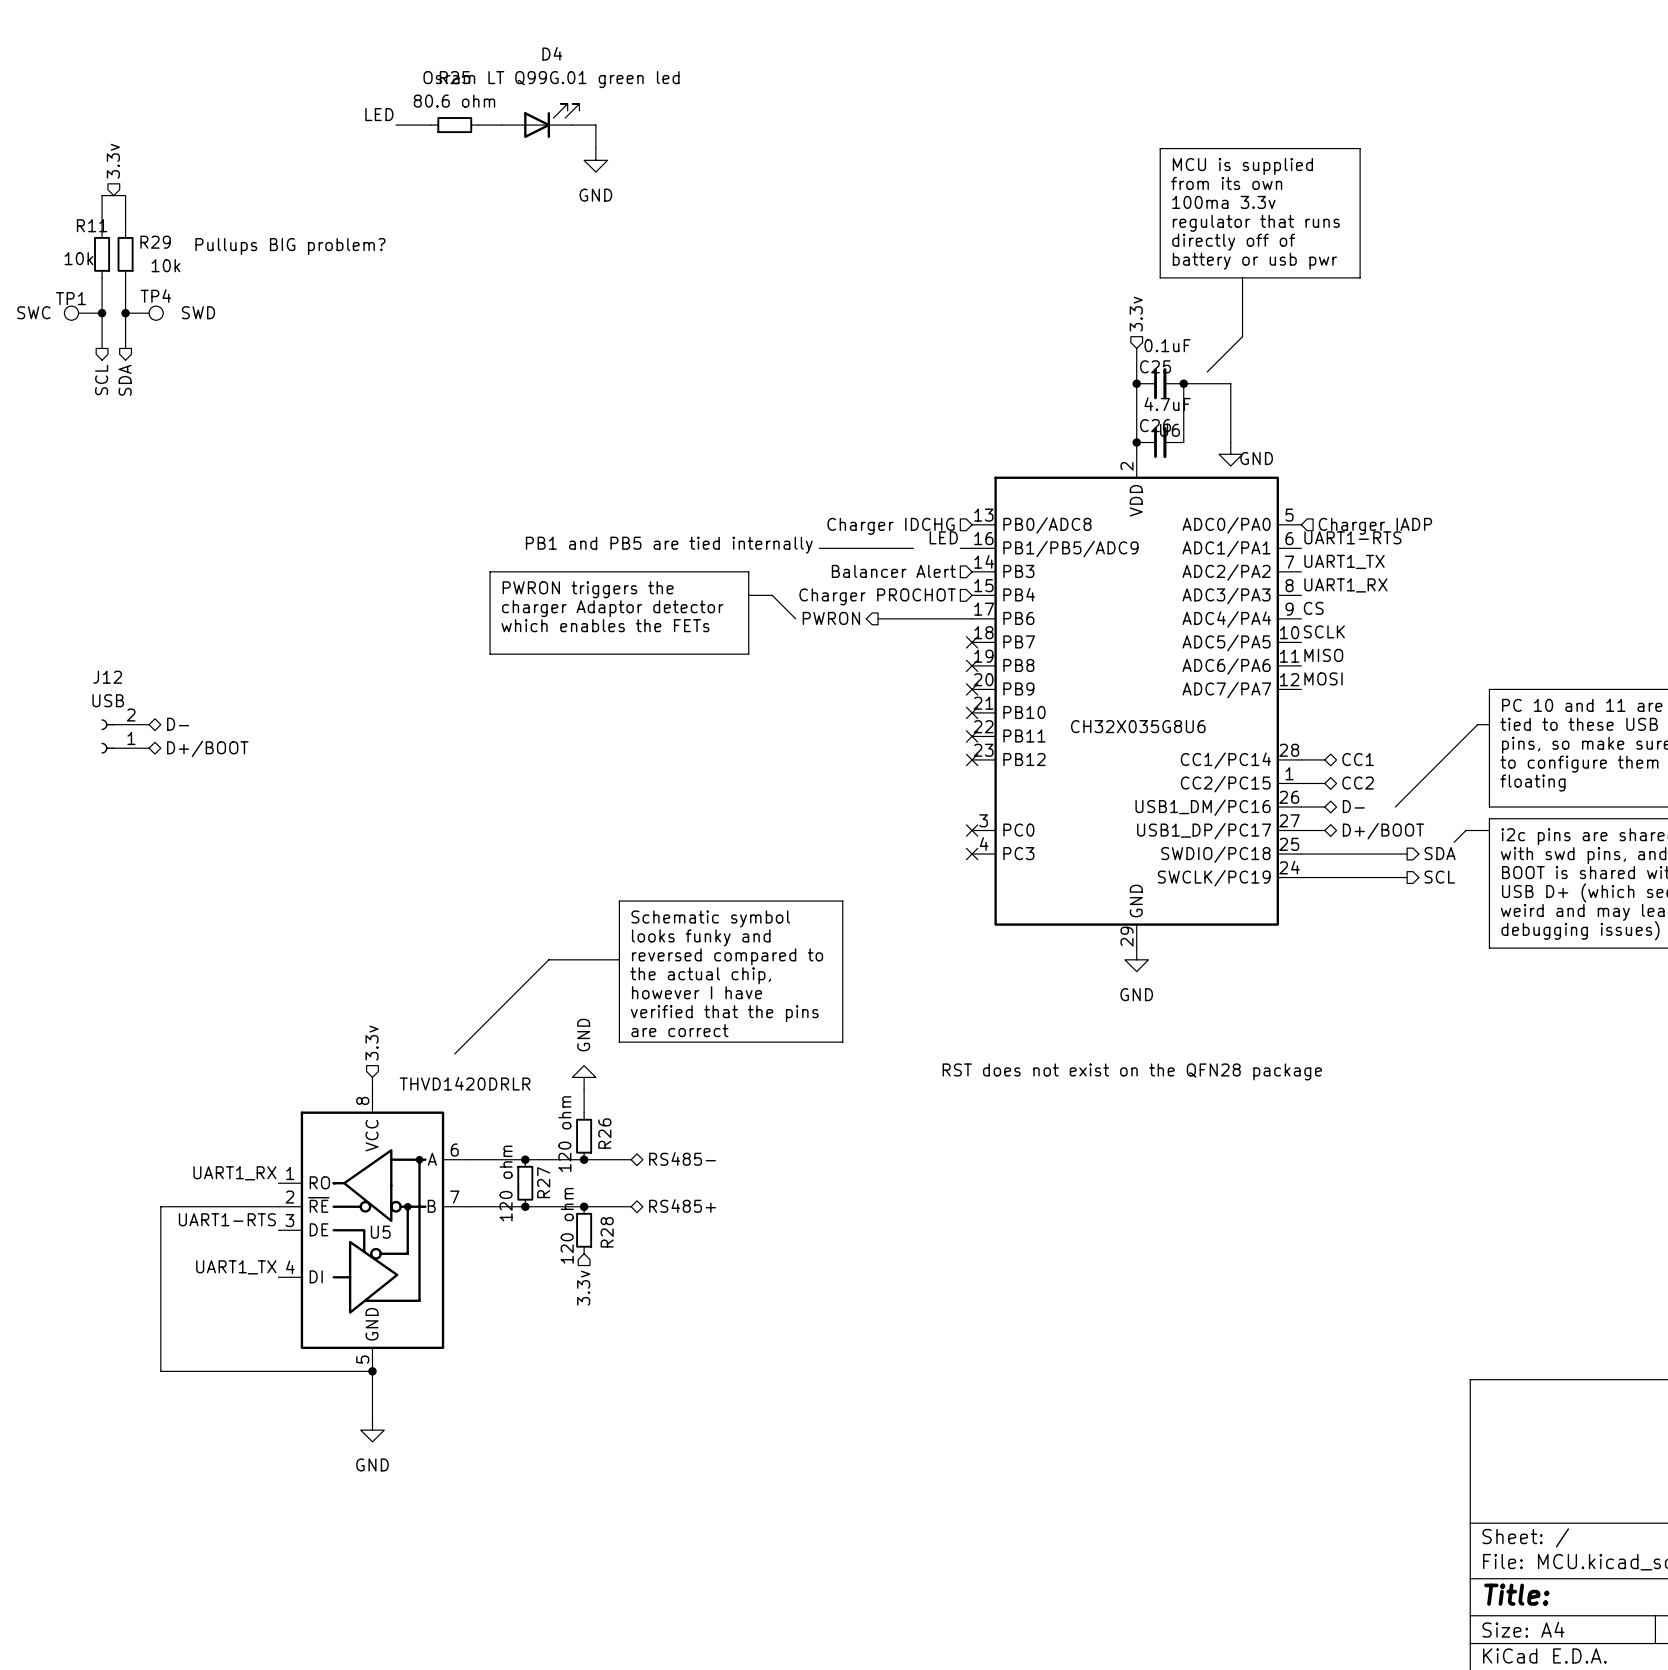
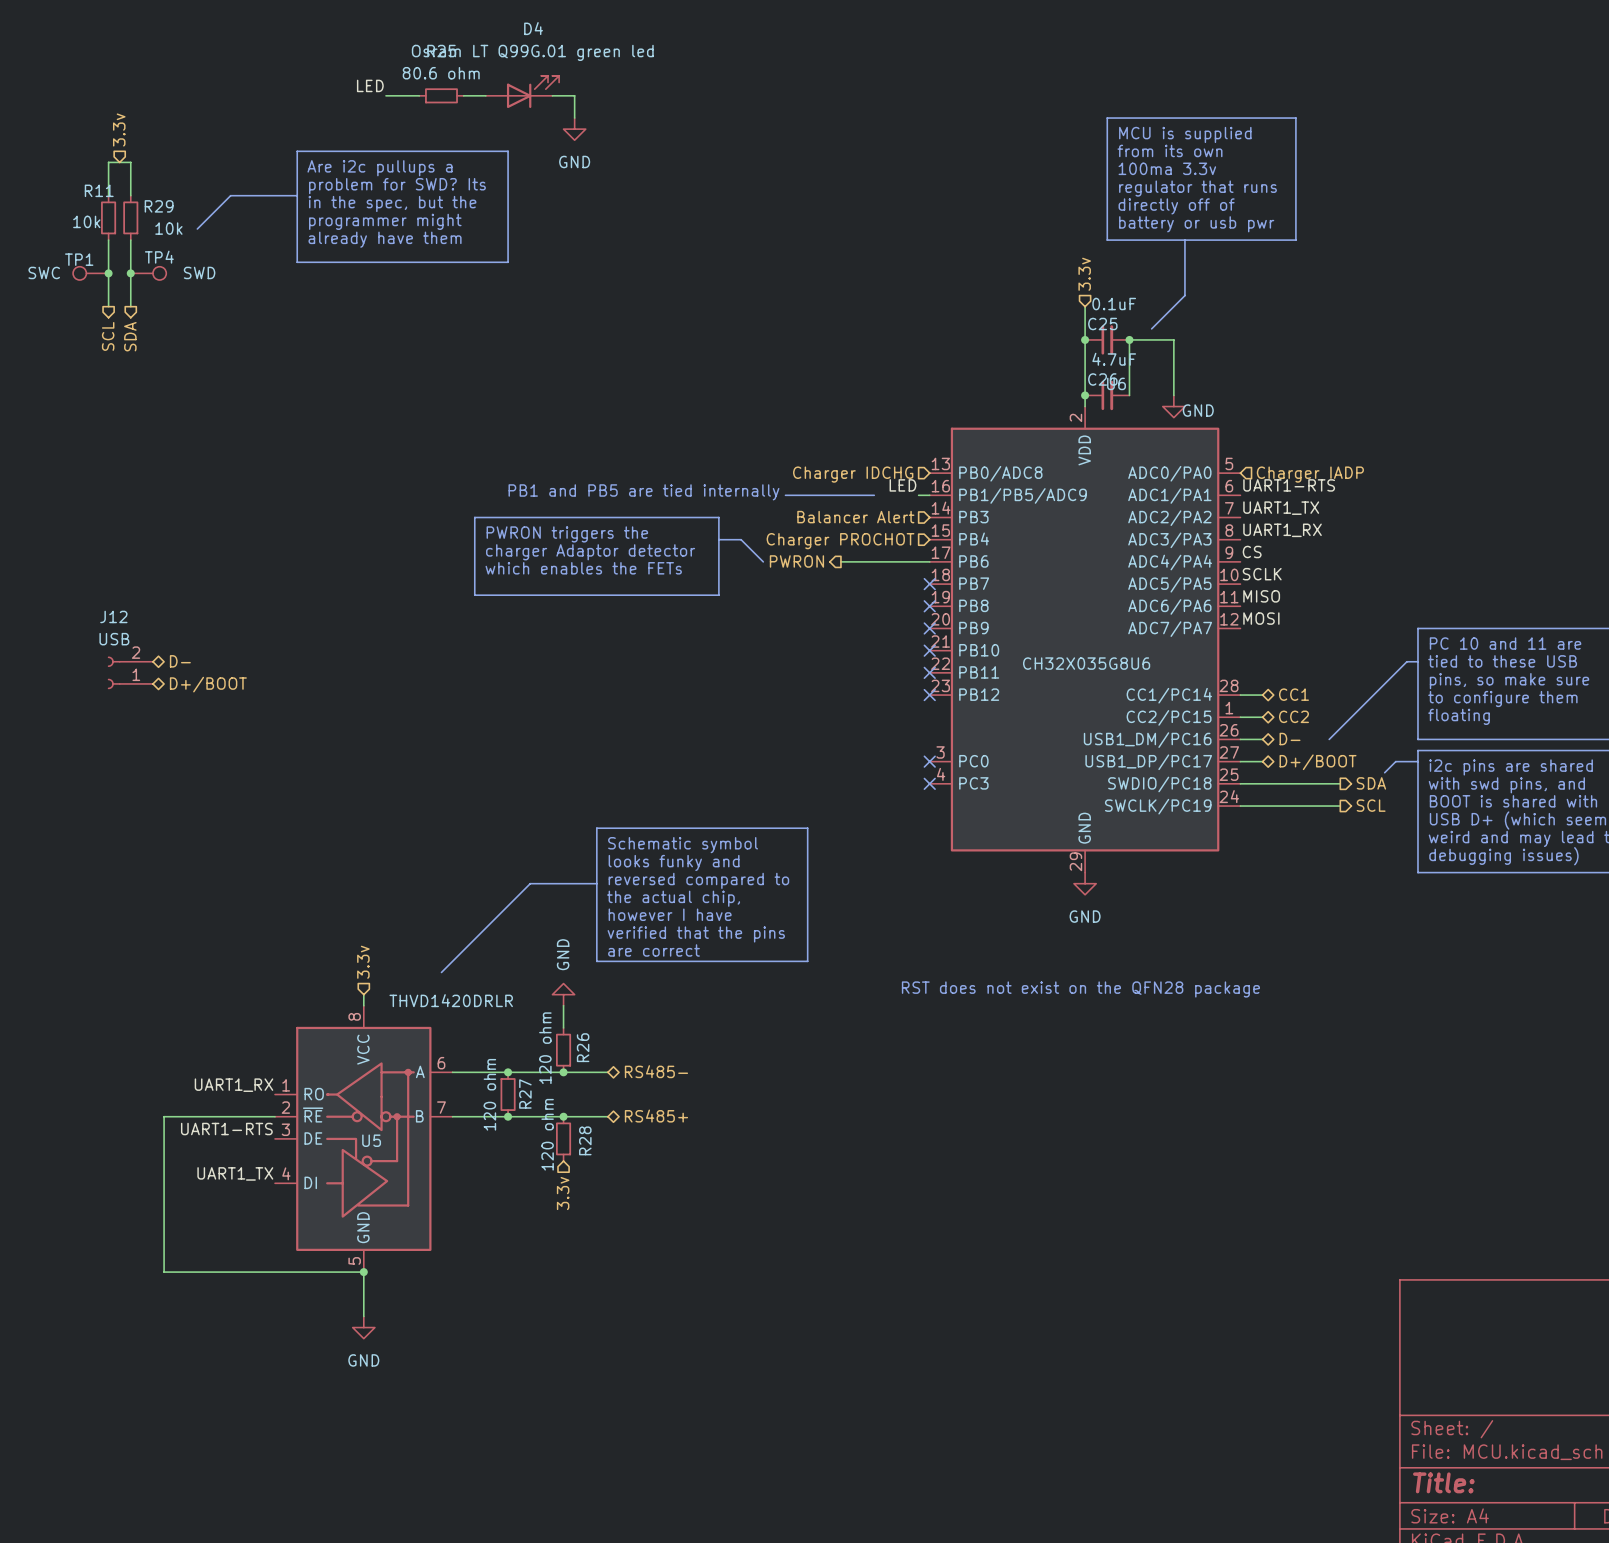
line: none -> (297, 151) (508, 151) (508, 262) (297, 262) (297, 151)
text: none -> Are i2c pullups a (380, 168)
text: none -> problem for SWD? Its (397, 186)
line: none -> (297, 195) (230, 195) (197, 228)
text: none -> in the spec, but the (392, 203)
text: Pullups BIG problem? (290, 246) -> none
text: none -> programmer might (385, 221)
text: none -> already have them (385, 239)

